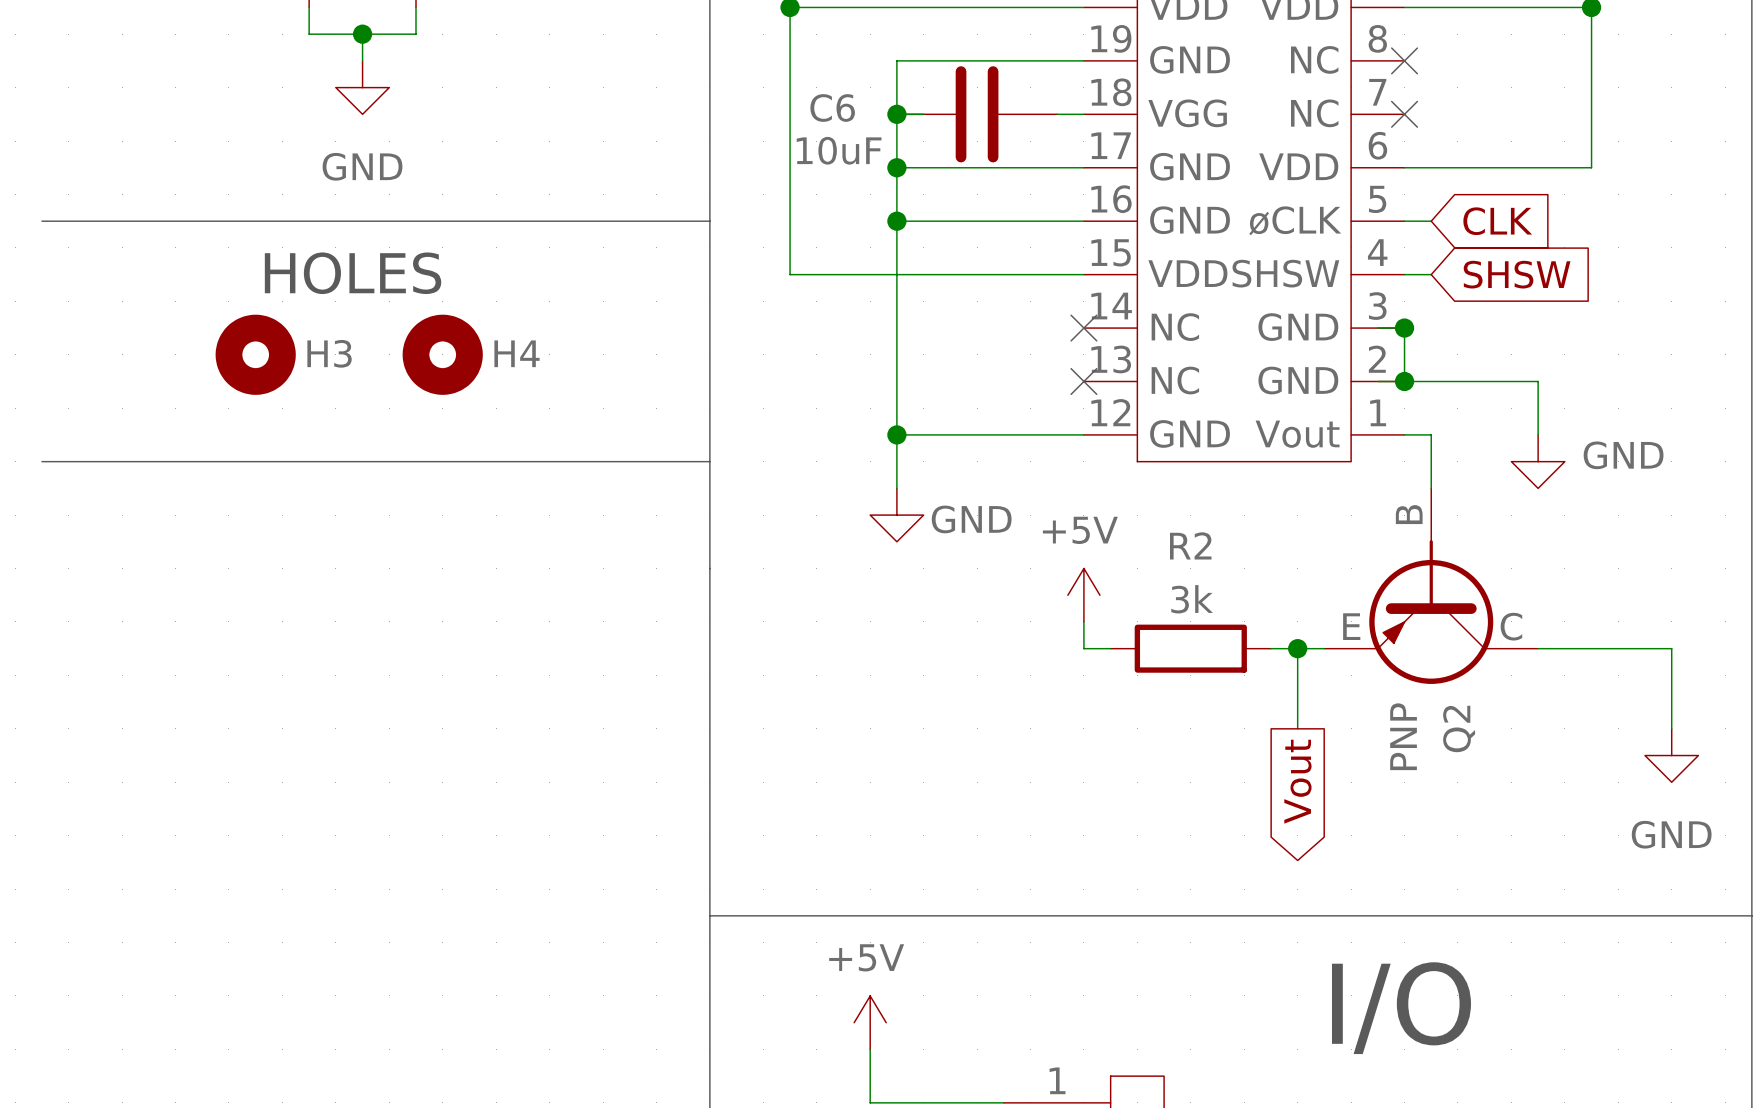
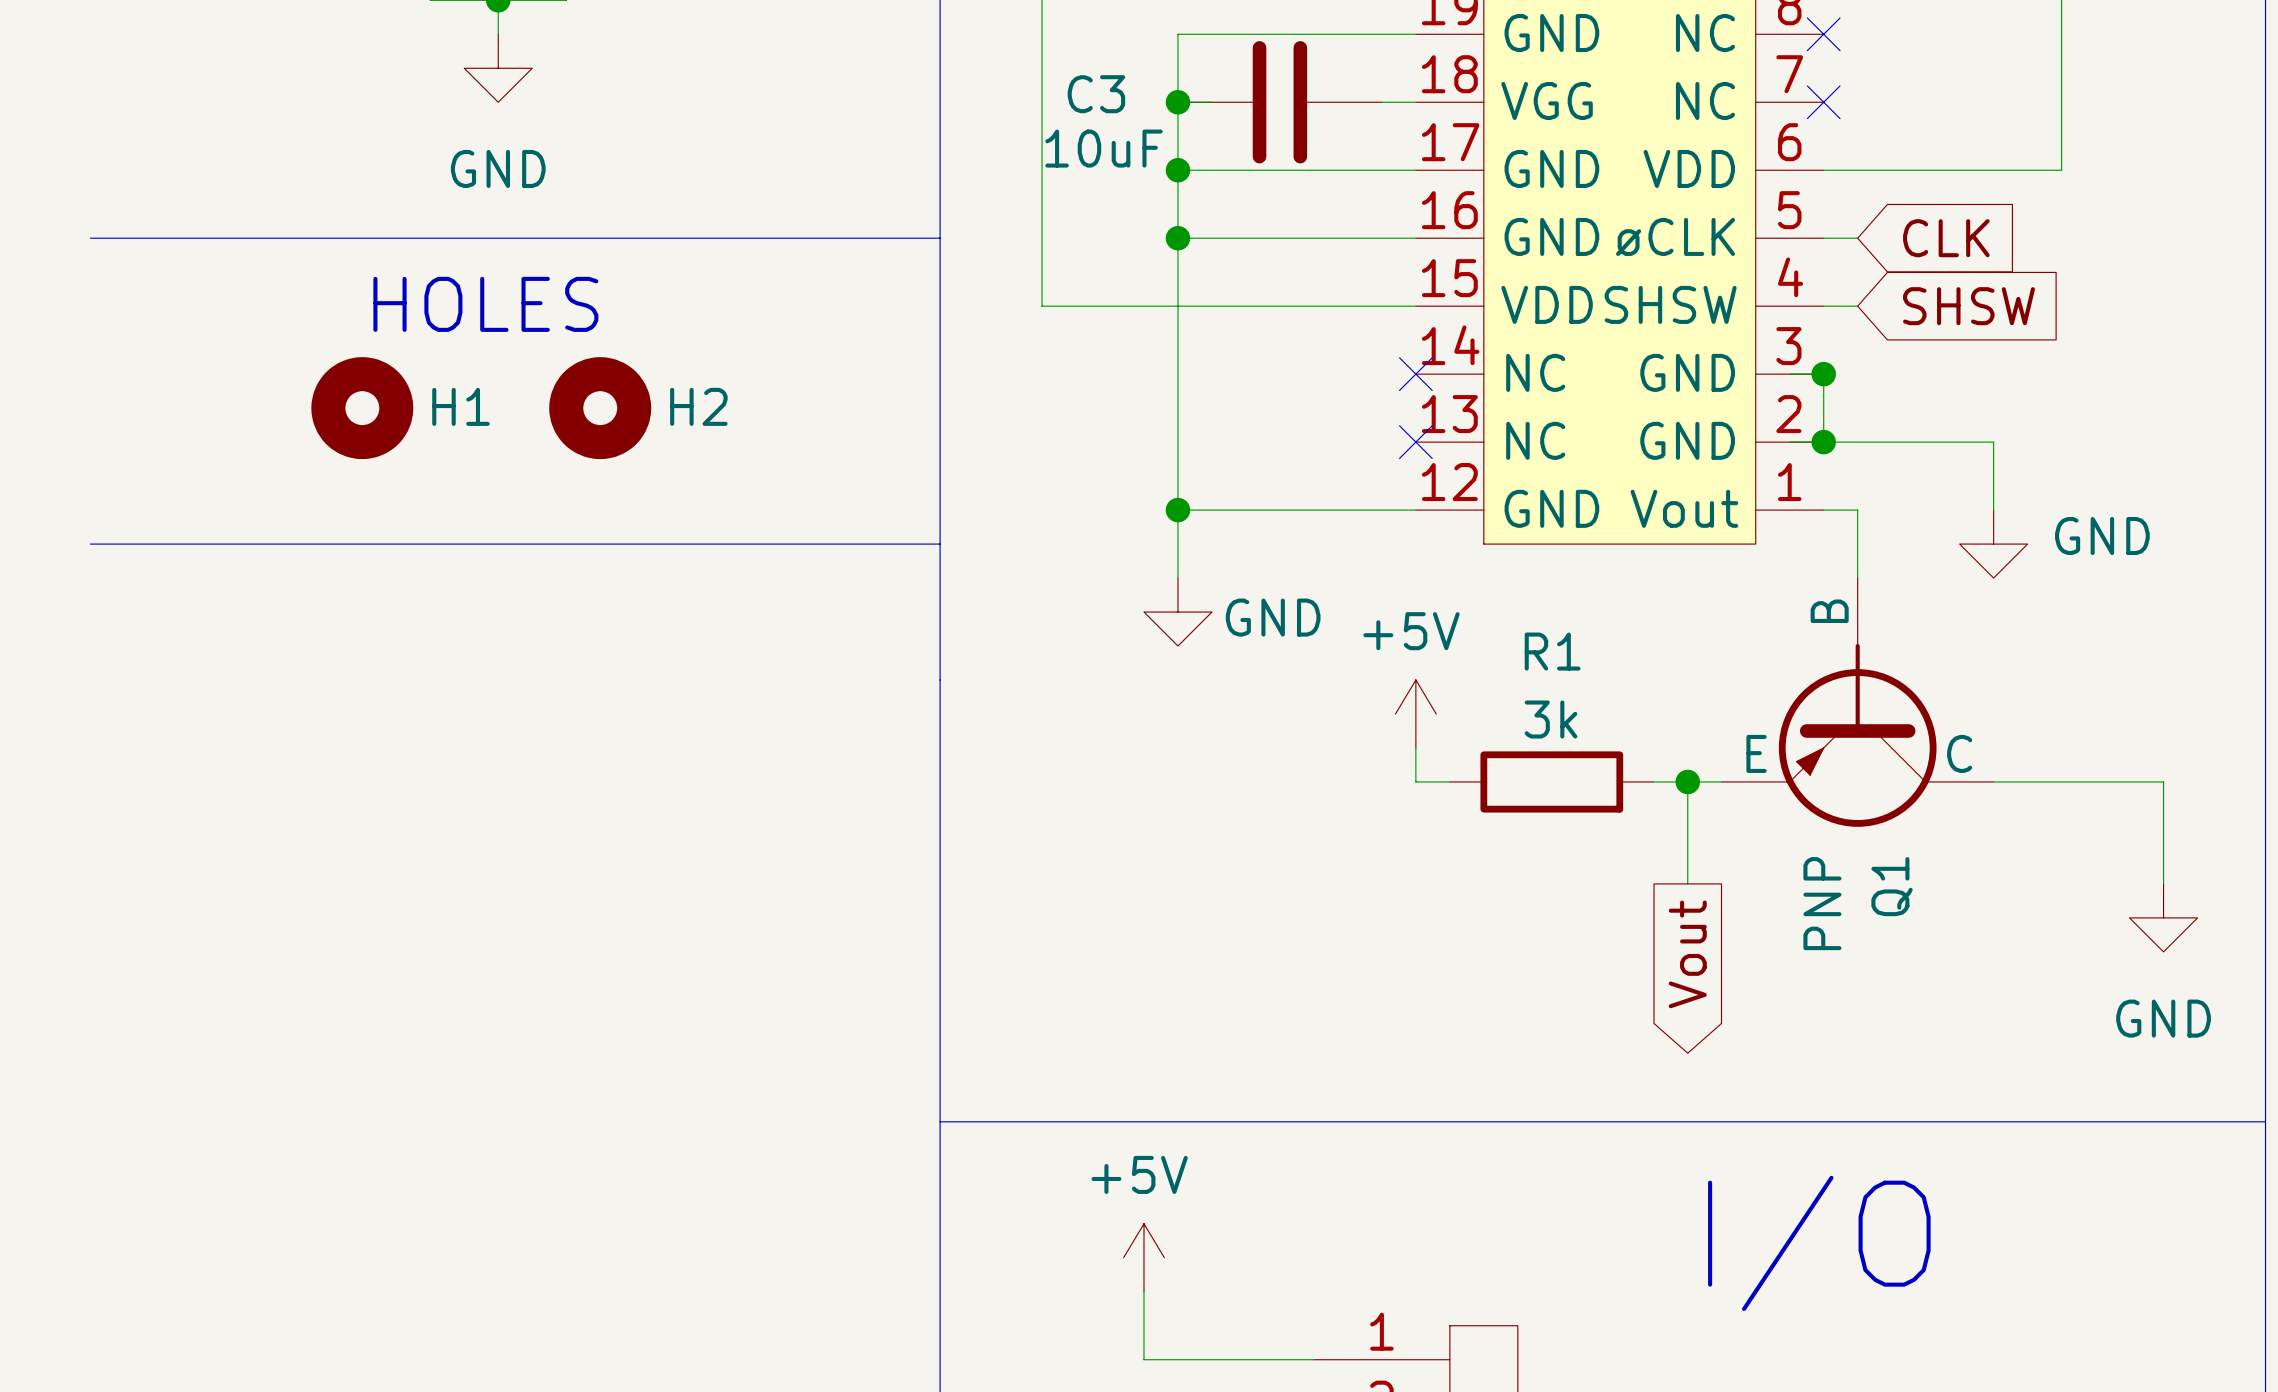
C6 name: C6 (832, 108) -> C3 (1096, 94)
H3 name: H3 (329, 353) -> H1 (460, 406)
H4 name: H4 (517, 353) -> H2 (698, 406)
R2 name: R2 (1190, 545) -> R1 (1552, 651)
Q2 name: Q2 (1459, 728) -> Q1 (1892, 886)

